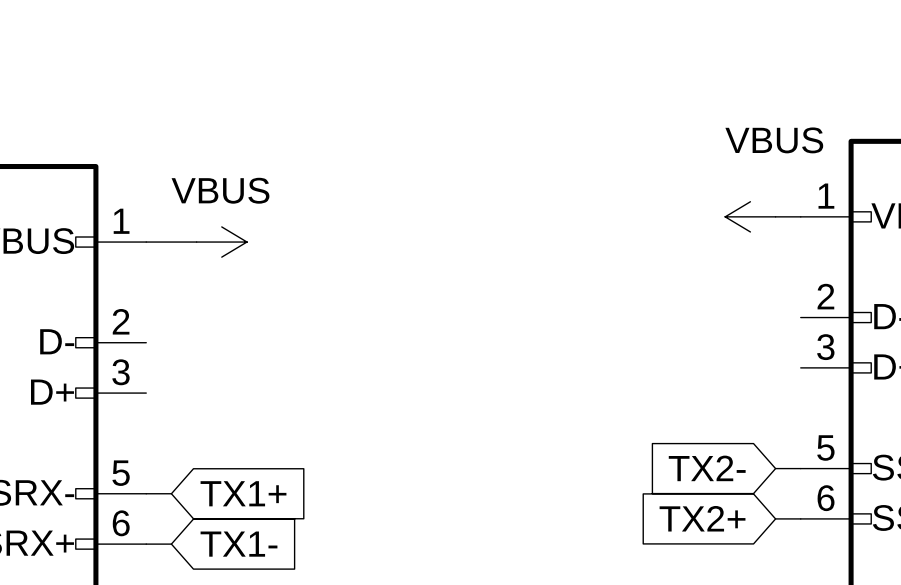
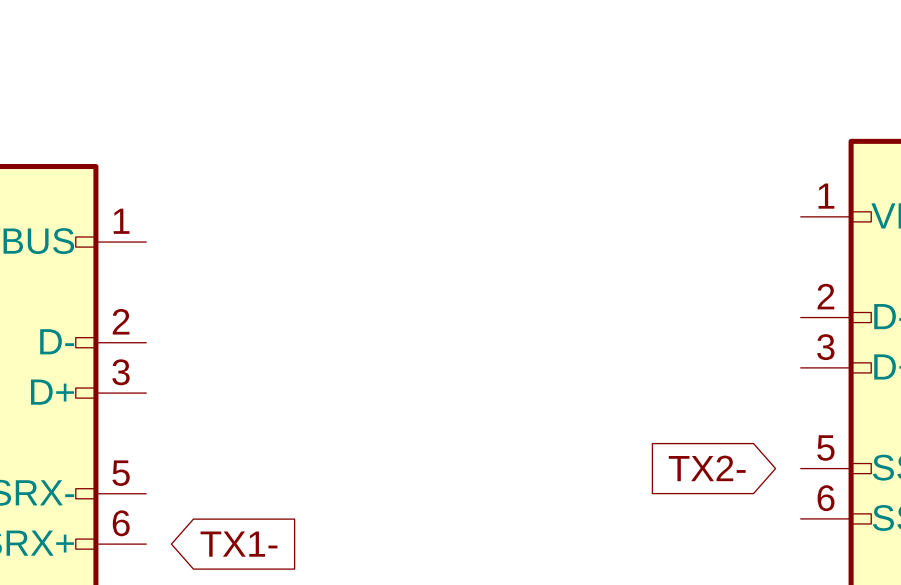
power symbol: VBUS (750, 216) -> none
wire: (775, 216) (800, 216) -> none
wire: (146, 242) (196, 242) -> none
power symbol: VBUS (221, 242) -> none
wire: (775, 468) (800, 468) -> none
wire: (146, 493) (171, 493) -> none
global label: TX1+ (243, 493) -> none
global label: TX2+ (702, 518) -> none
wire: (775, 518) (800, 518) -> none
wire: (146, 544) (171, 544) -> none

